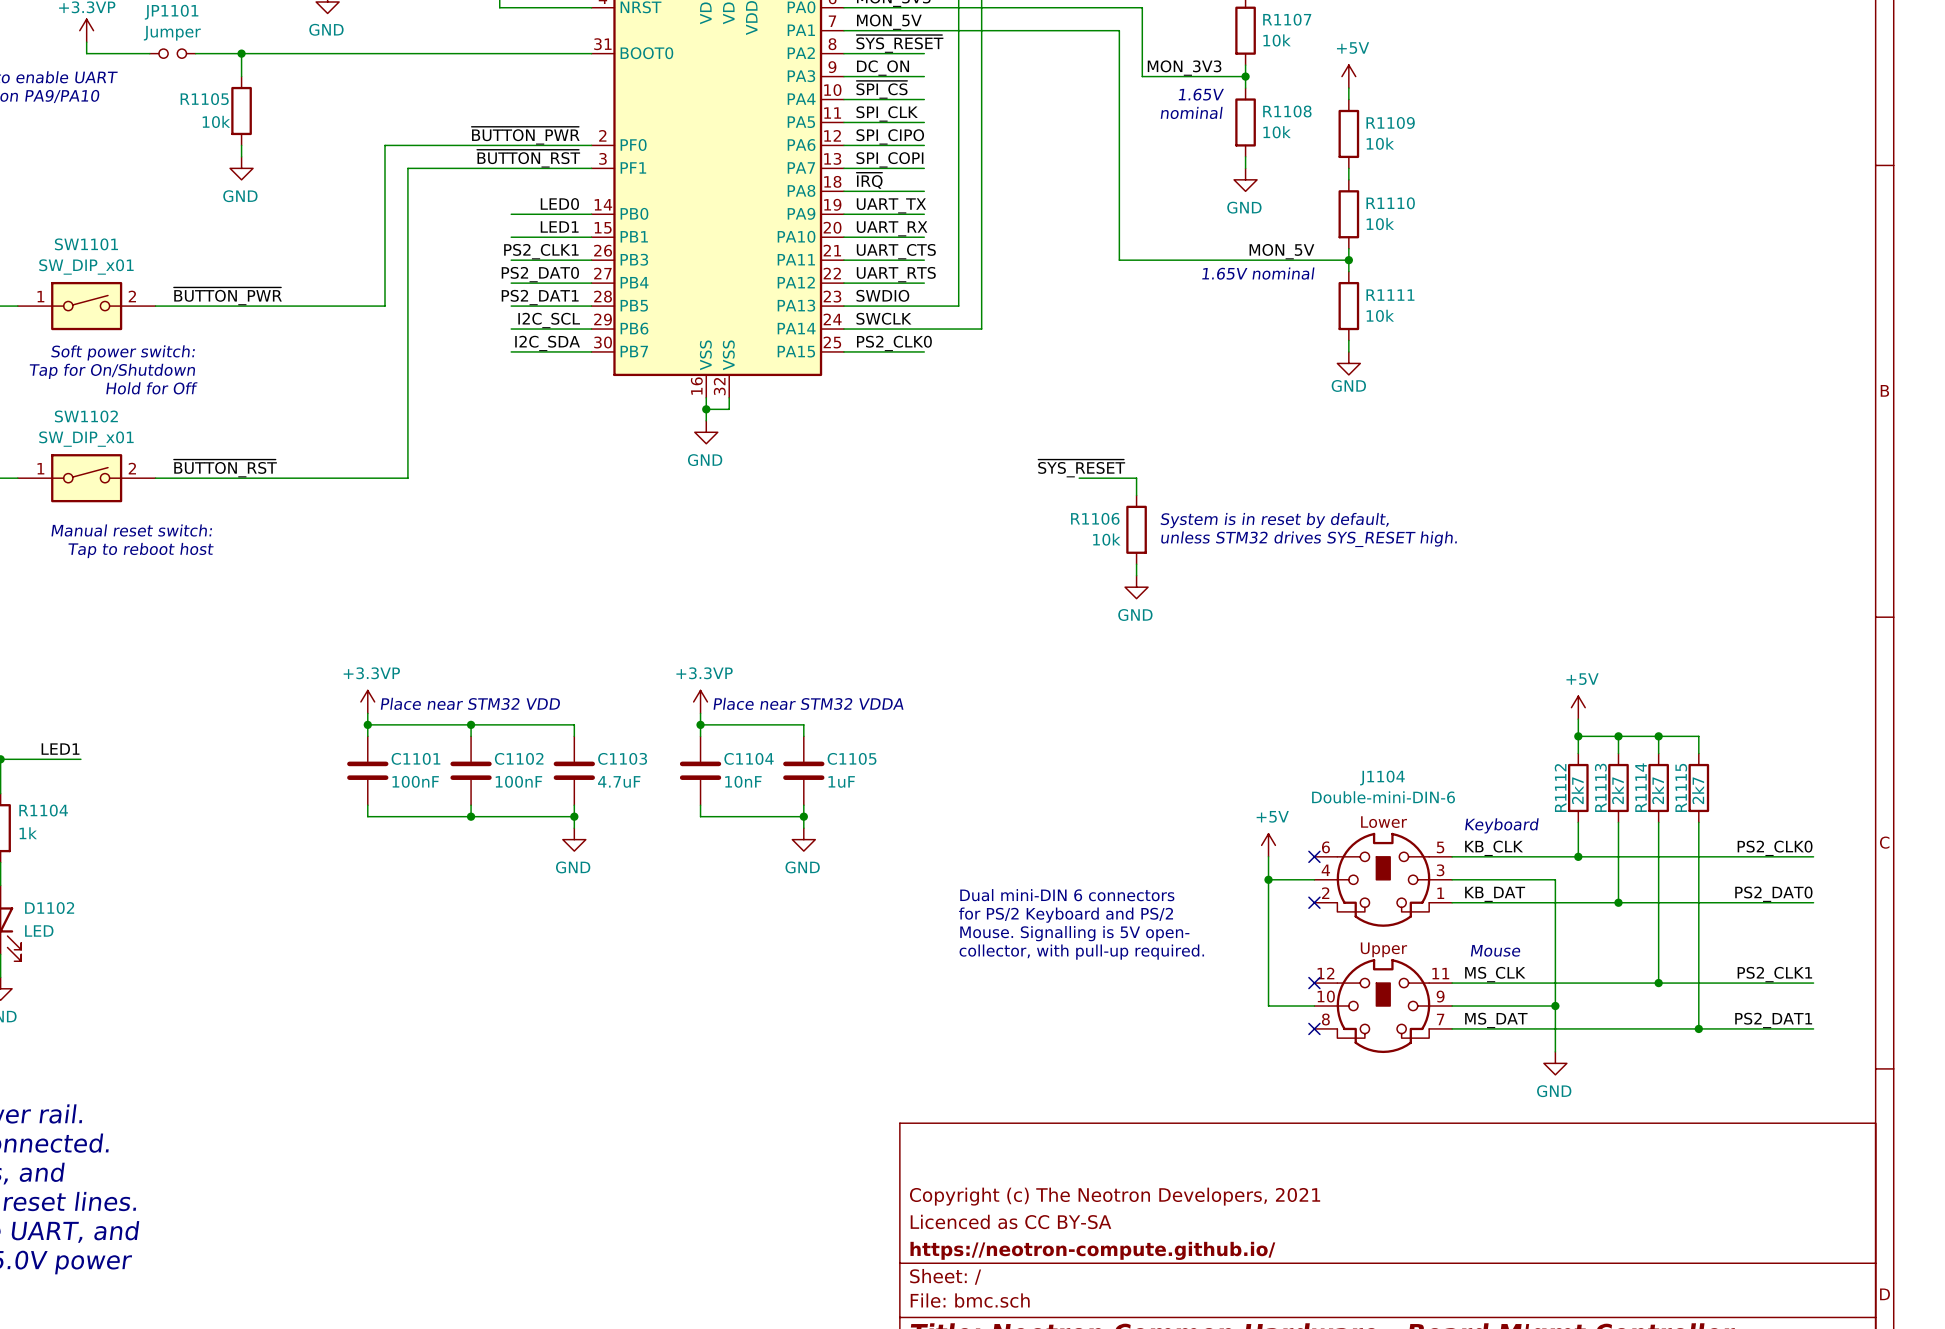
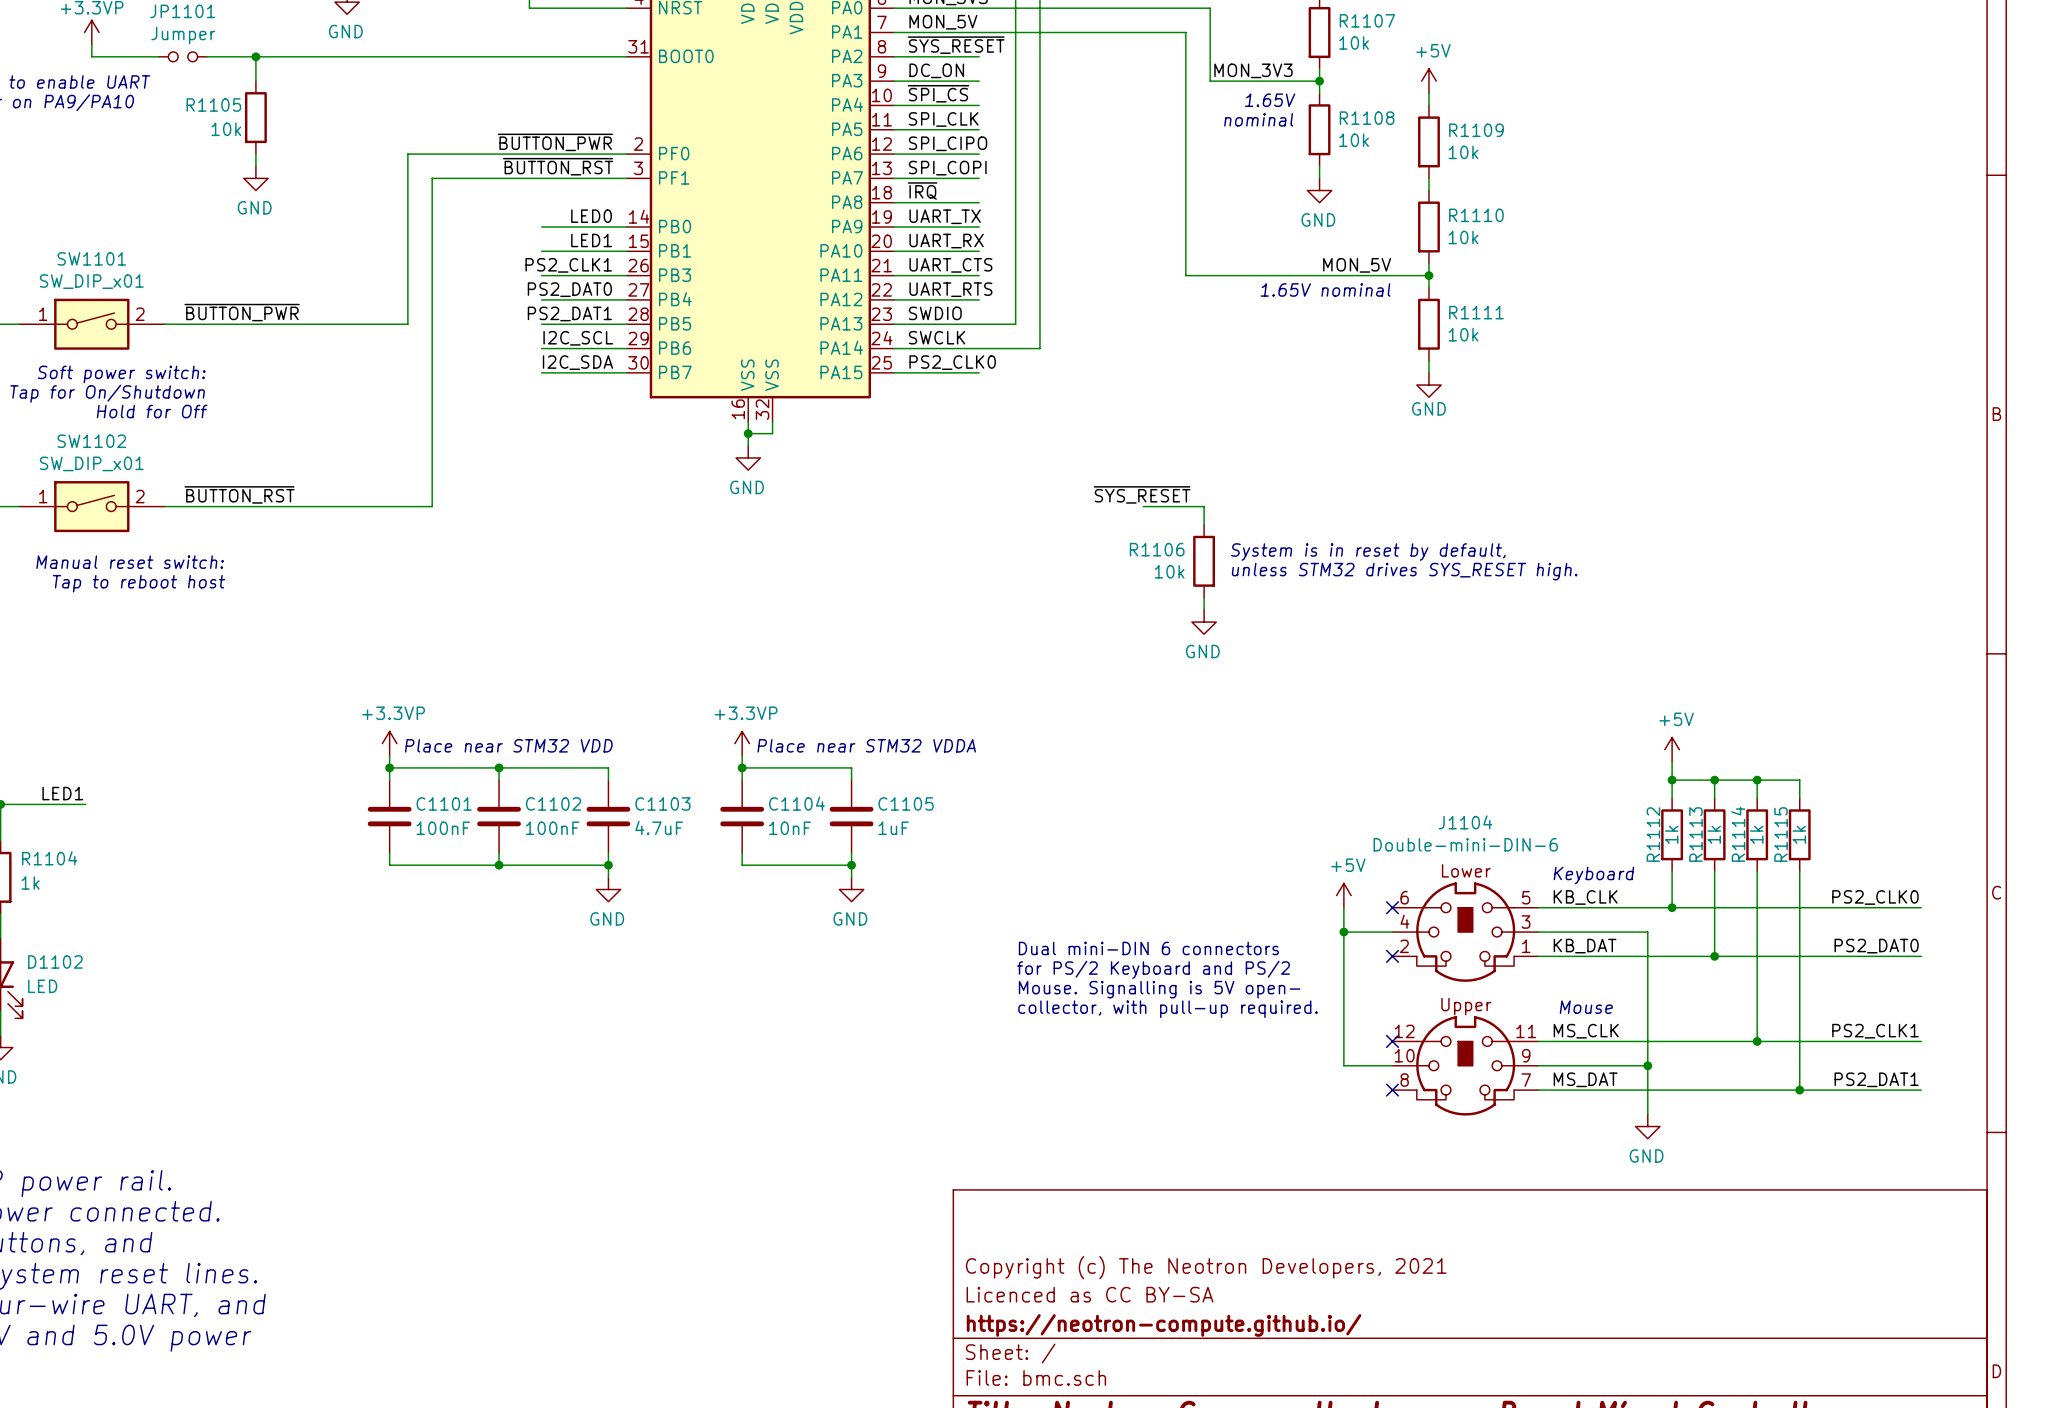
R1112 value: 2k7 (1577, 790) -> 1k (1671, 834)
R1113 value: 2k7 (1617, 790) -> 1k (1714, 834)
R1114 value: 2k7 (1657, 790) -> 1k (1756, 834)
R1115 value: 2k7 (1698, 790) -> 1k (1799, 834)

